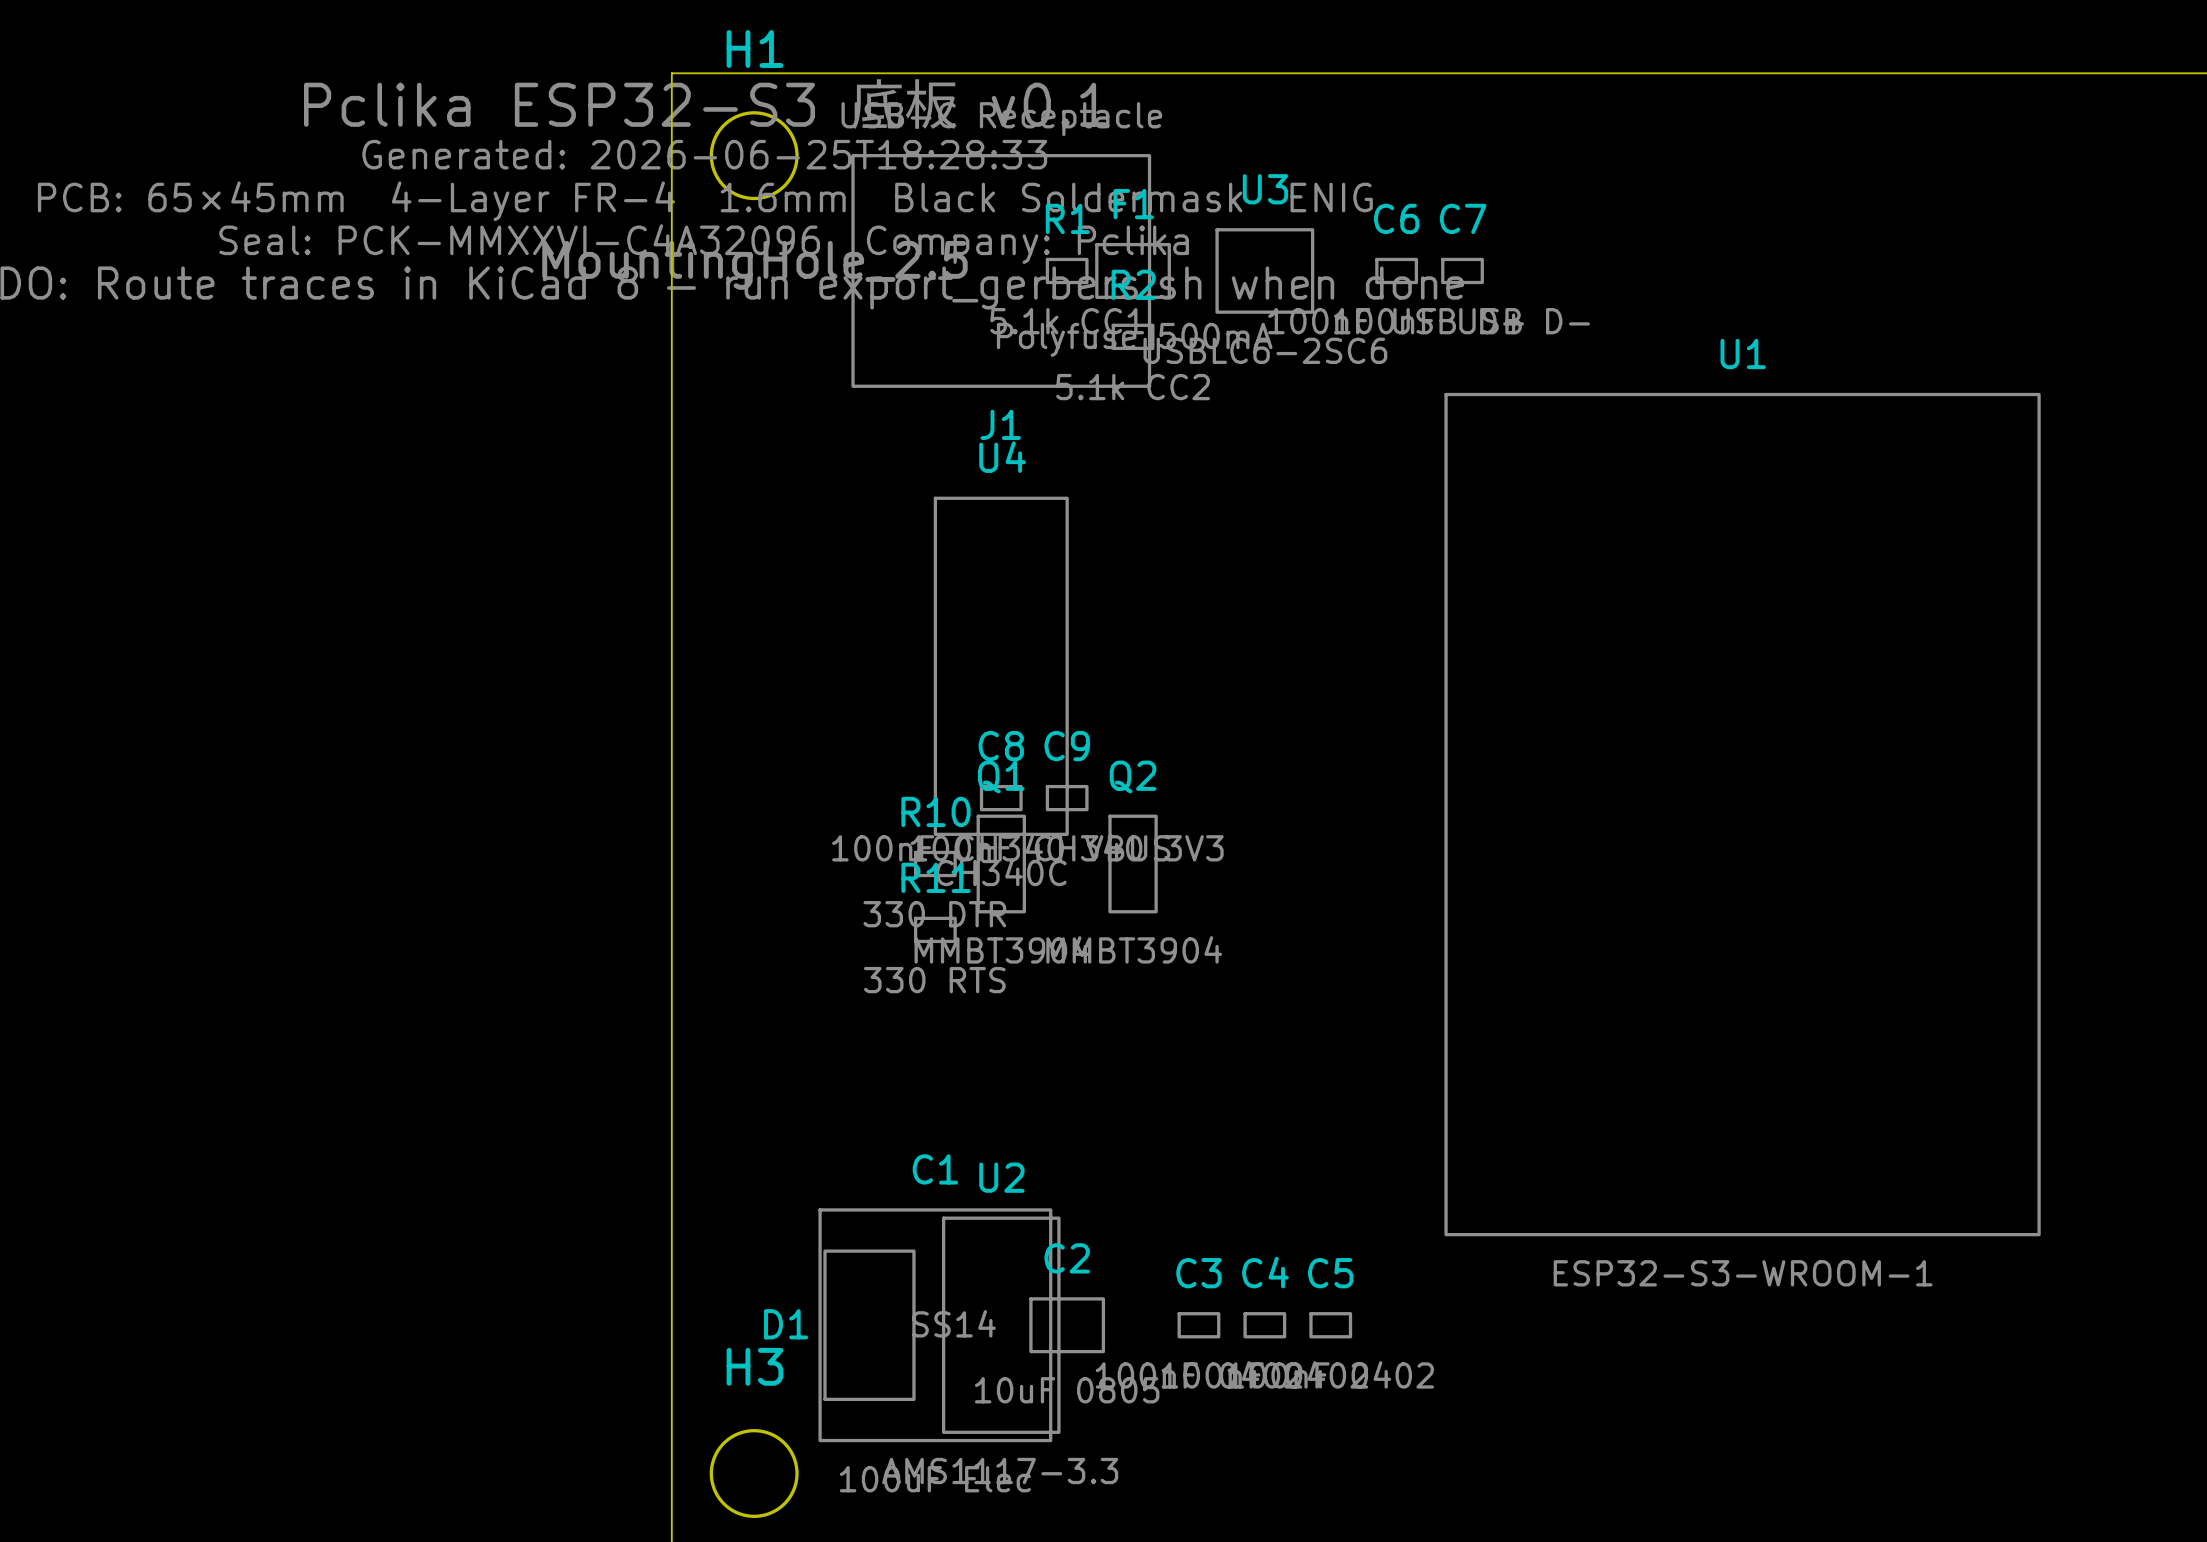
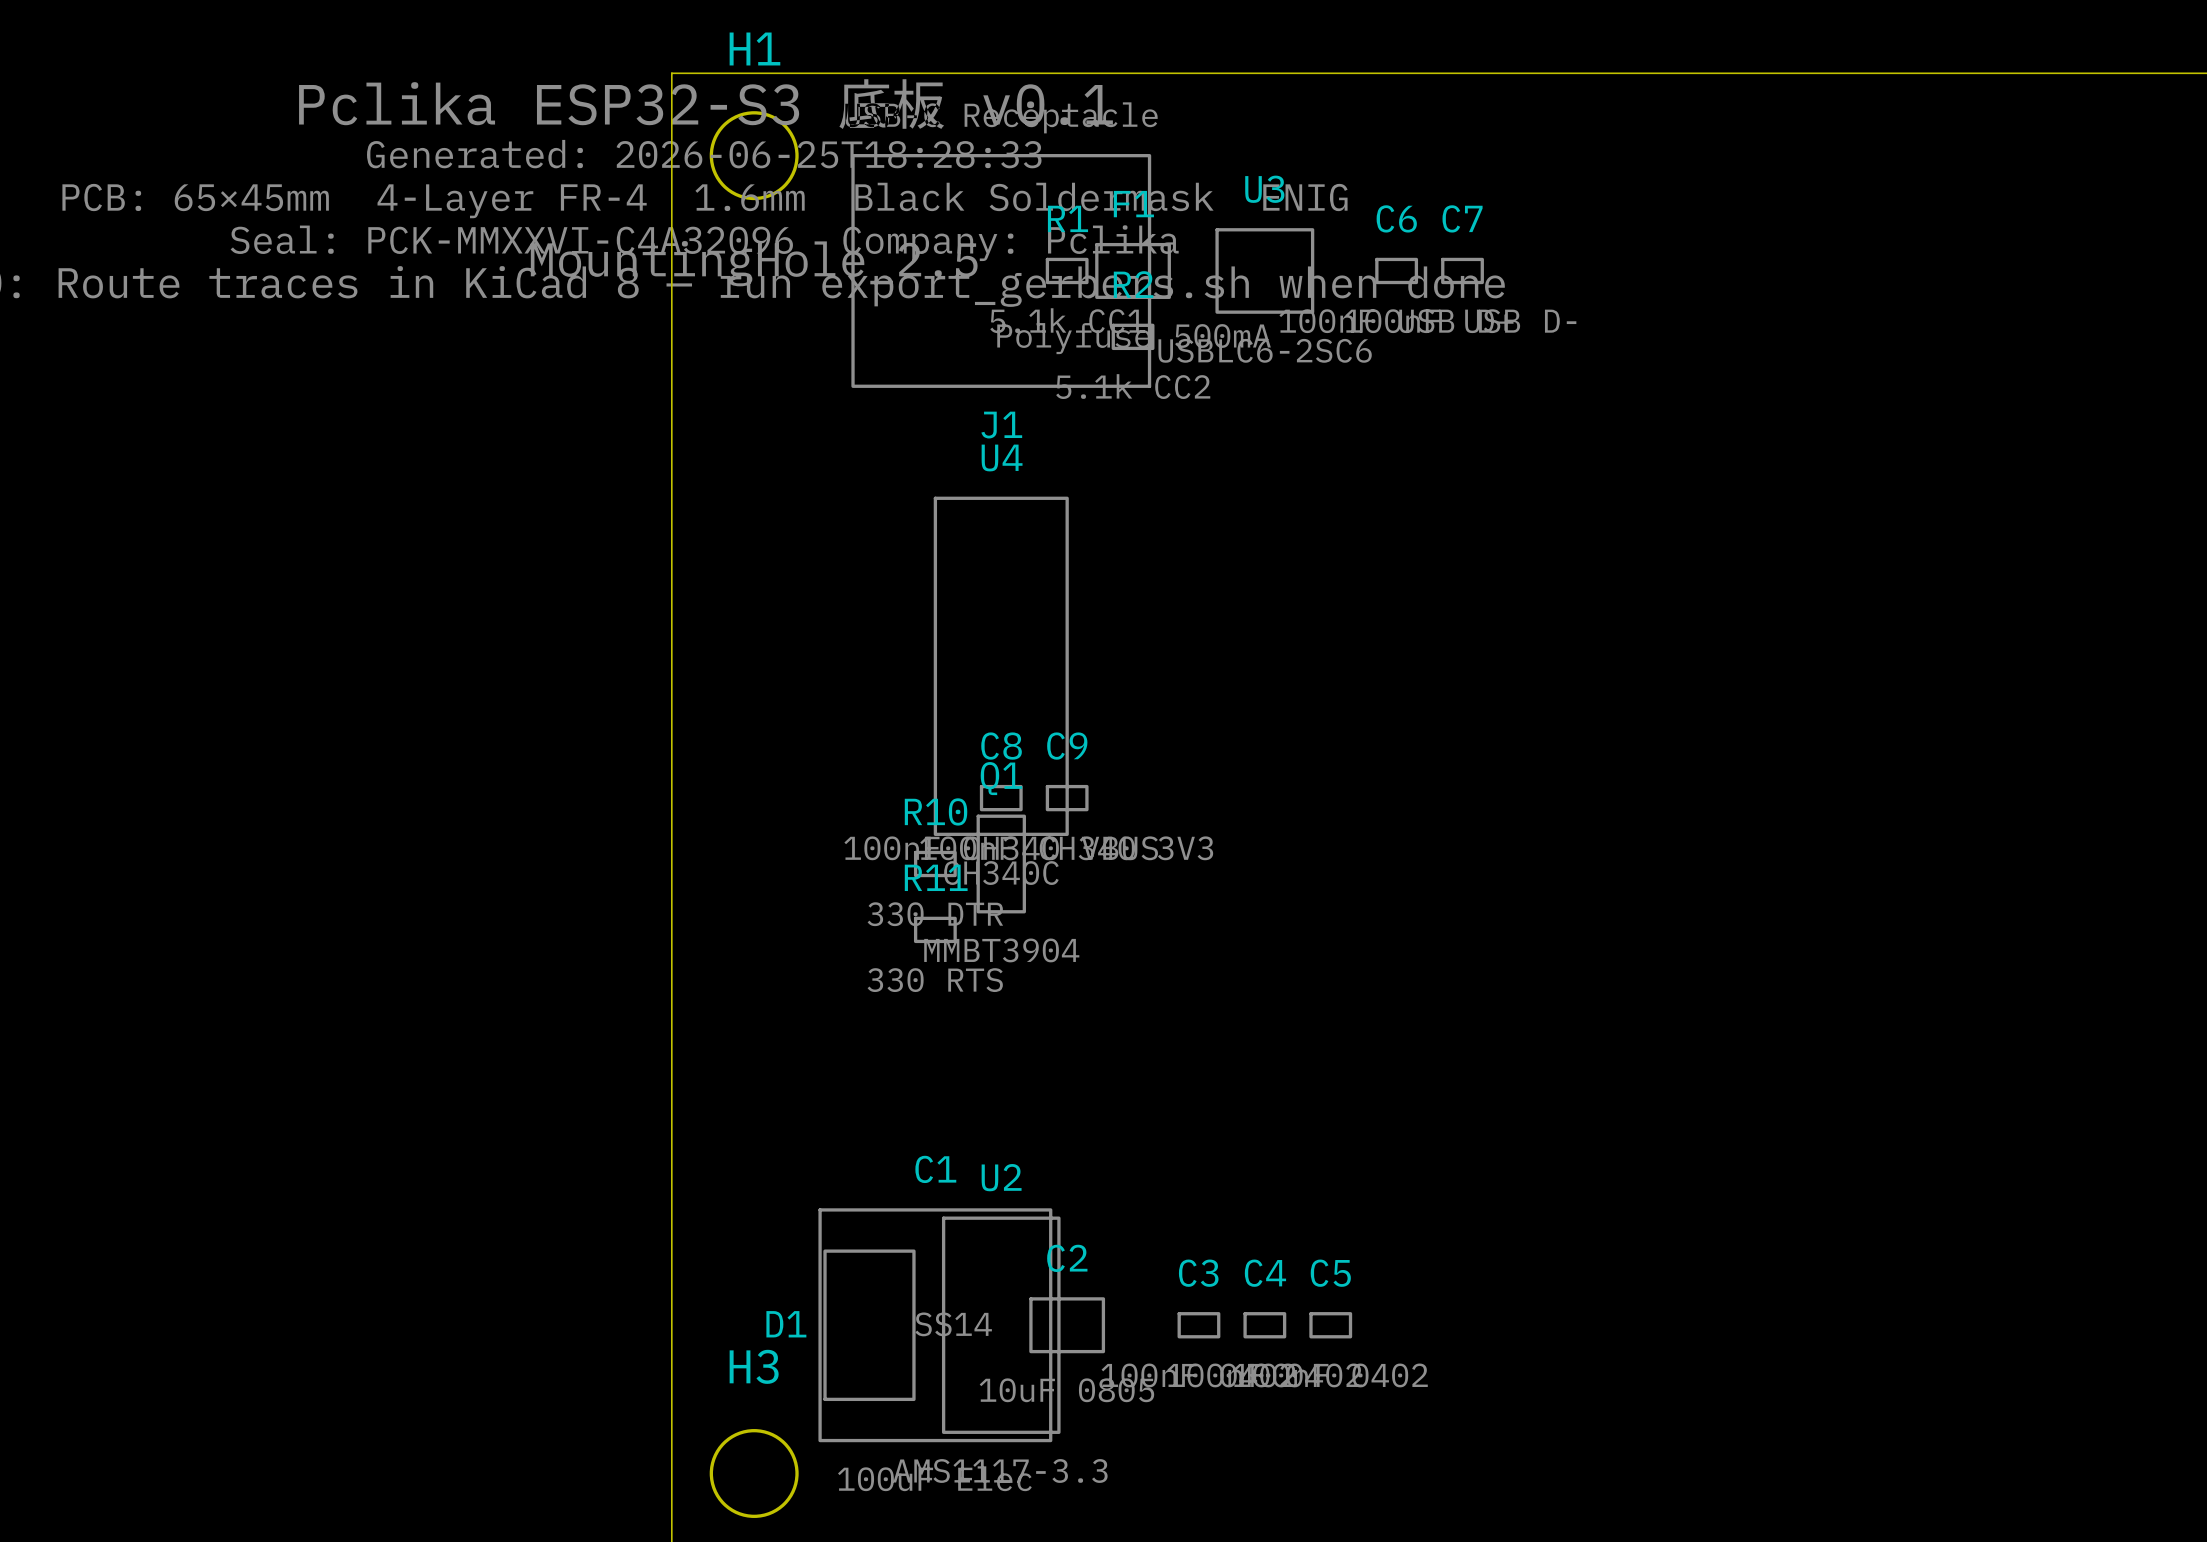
U1: ESP32-S3-WROOM-1 (1742, 814) -> none
Q2: MMBT3904 (1133, 864) -> none

